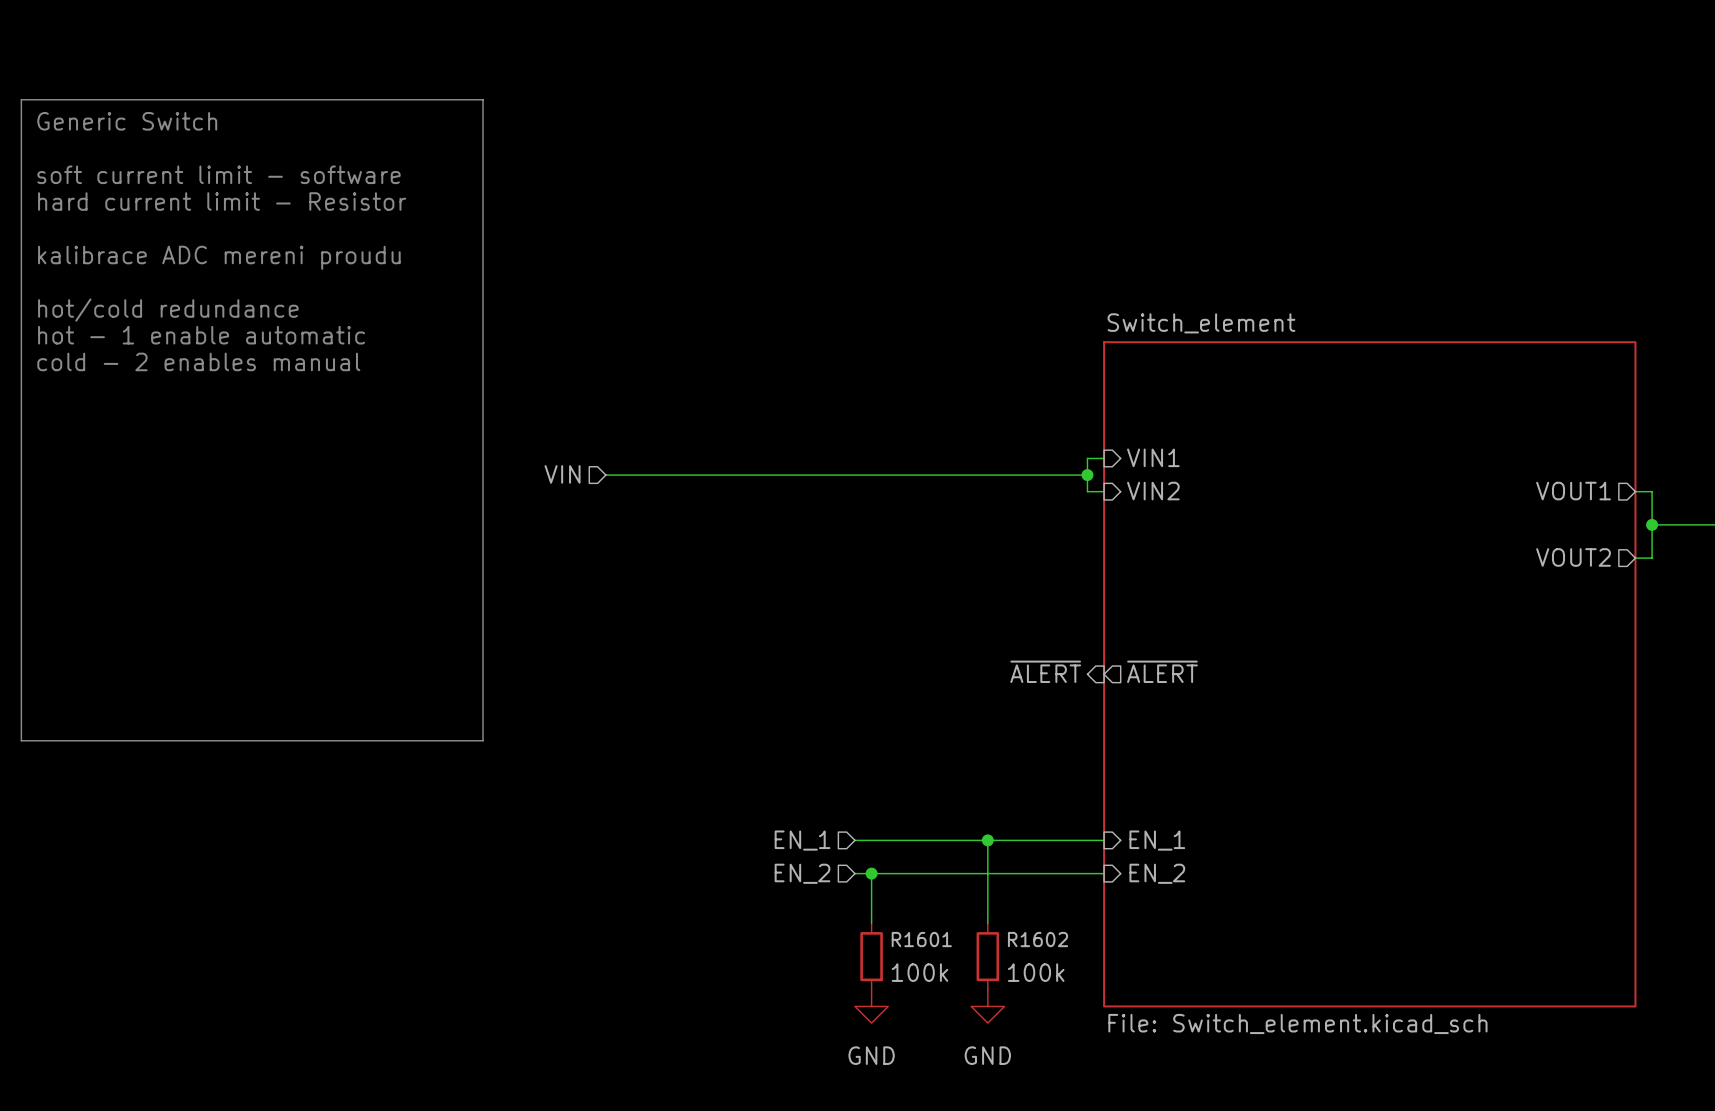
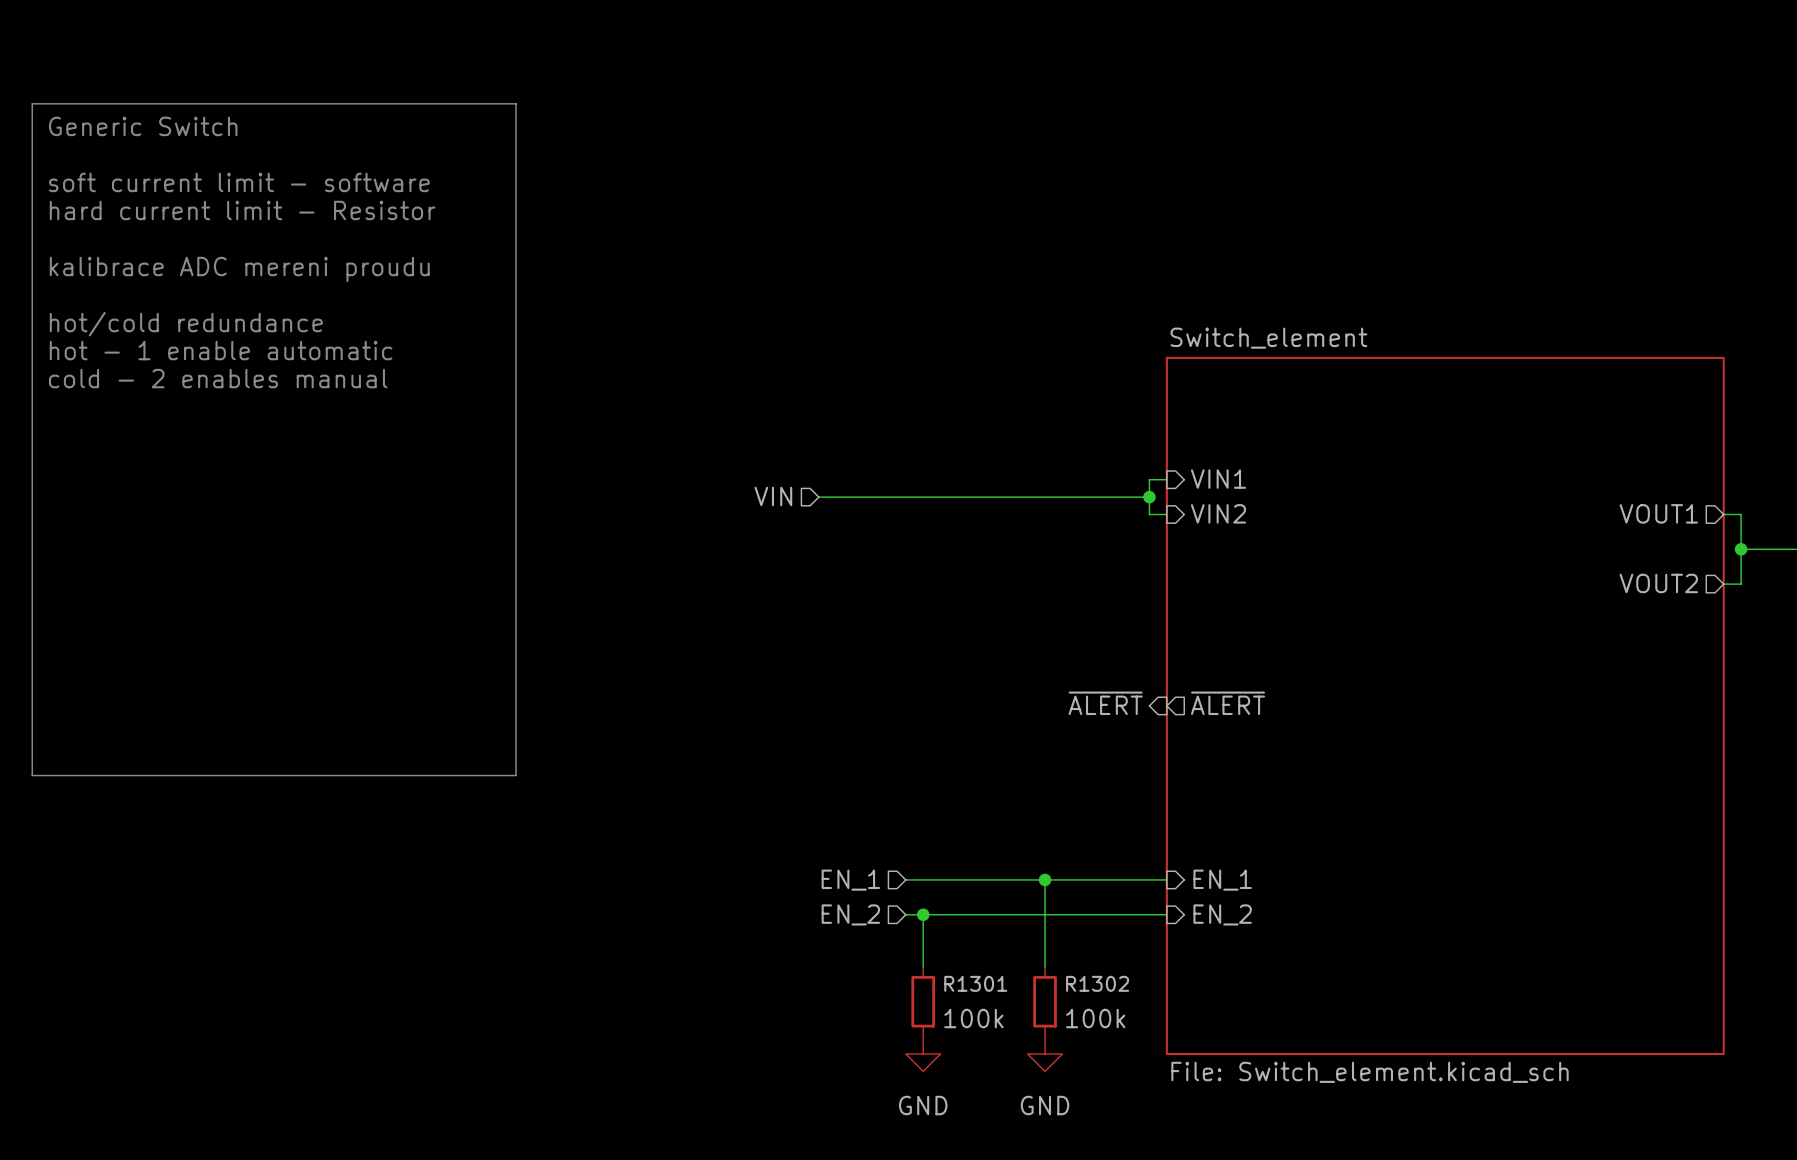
hierarchical label position: VIN (562, 474) -> VIN (773, 496)
wire: (605, 475) (771, 475) -> none
R1601 name: R1601 (921, 939) -> R1301 (975, 983)
R1602 name: R1602 (1038, 939) -> R1302 (1097, 983)

